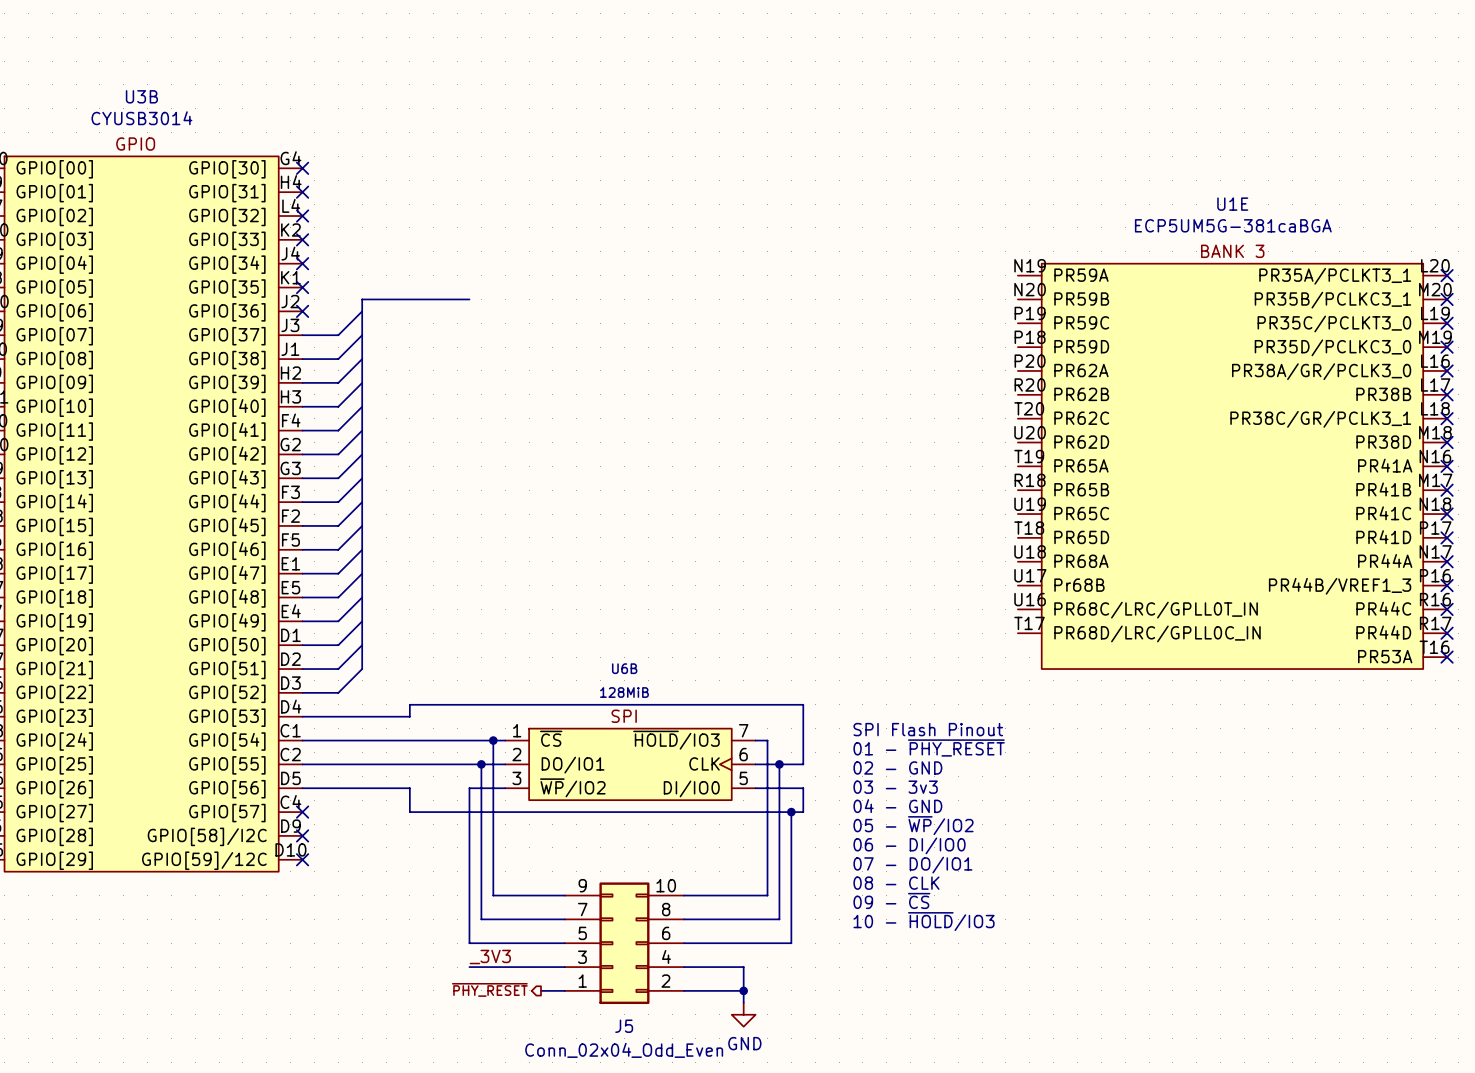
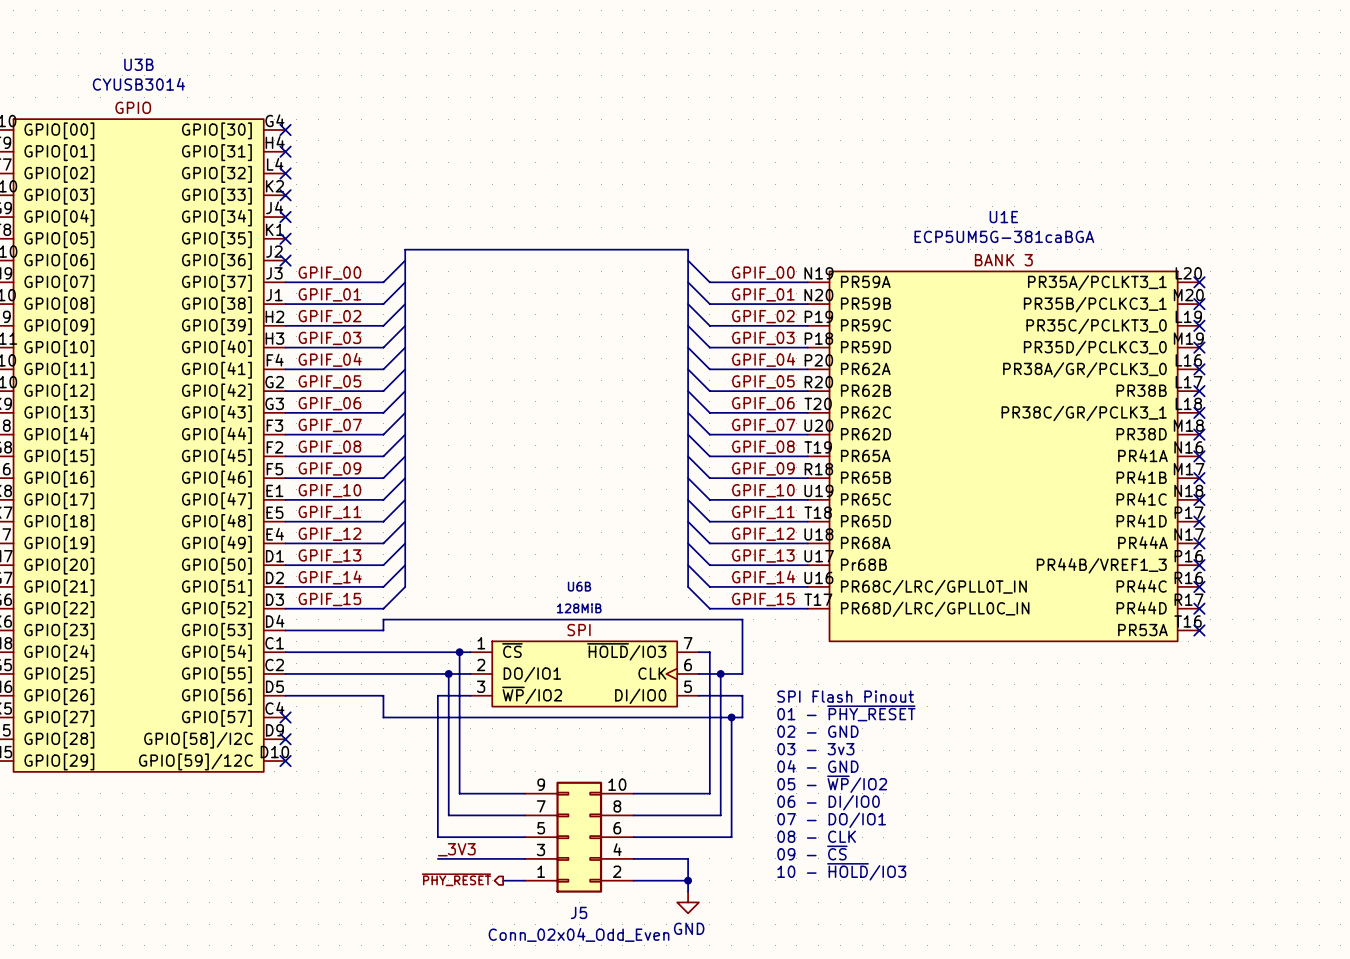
no-connect mark: (1447, 275) -> none
bus: (433, 299) (362, 299) (362, 669) -> (405, 249) (405, 586)
bus: none -> (437, 249) (688, 249) (688, 586)
no-connect mark: (1447, 299) -> none
wire: (362, 311) (338, 335) -> (405, 260) (383, 282) (318, 282)
wire: none -> (688, 260) (709, 282) (807, 282)
no-connect mark: (1447, 323) -> none
label: none -> GPIF_00 (329, 273)
label: none -> GPIF_00 (763, 273)
wire: (362, 335) (338, 359) -> (405, 282) (383, 304) (318, 304)
wire: none -> (688, 282) (709, 304) (807, 304)
no-connect mark: none -> (1199, 282)
no-connect mark: (1447, 347) -> none
label: none -> GPIF_01 (329, 294)
label: none -> GPIF_01 (763, 294)
wire: (362, 359) (338, 382) -> (405, 304) (383, 325) (318, 325)
wire: none -> (688, 304) (709, 325) (807, 325)
no-connect mark: none -> (1199, 304)
no-connect mark: (1447, 370) -> none
label: none -> GPIF_02 (329, 316)
label: none -> GPIF_02 (763, 316)
wire: (362, 382) (338, 406) -> (405, 325) (383, 347) (318, 347)
wire: none -> (688, 325) (709, 347) (807, 347)
no-connect mark: none -> (1199, 325)
no-connect mark: (1447, 394) -> none
label: none -> GPIF_03 (329, 338)
label: none -> GPIF_03 (763, 338)
wire: (362, 406) (338, 430) -> (405, 347) (383, 369) (318, 369)
wire: none -> (688, 347) (709, 369) (807, 369)
no-connect mark: none -> (1199, 347)
no-connect mark: (1447, 418) -> none
label: none -> GPIF_04 (330, 359)
label: none -> GPIF_04 (763, 359)
wire: (362, 430) (338, 454) -> (405, 369) (383, 391) (318, 391)
wire: none -> (688, 369) (709, 391) (807, 391)
no-connect mark: none -> (1199, 369)
no-connect mark: (1447, 442) -> none
label: none -> GPIF_05 (329, 381)
label: none -> GPIF_05 (763, 381)
wire: (362, 454) (338, 478) -> (405, 391) (383, 412) (318, 412)
wire: none -> (688, 391) (709, 412) (807, 412)
no-connect mark: none -> (1199, 391)
U1E position: (1232, 466) -> (1003, 456)
no-connect mark: (1447, 466) -> none
label: none -> GPIF_06 (329, 403)
label: none -> GPIF_06 (763, 403)
wire: (362, 478) (338, 502) -> (405, 412) (383, 434) (318, 434)
wire: none -> (688, 412) (709, 434) (807, 434)
no-connect mark: none -> (1199, 412)
no-connect mark: (1447, 490) -> none
label: none -> GPIF_07 (330, 425)
label: none -> GPIF_07 (763, 425)
wire: (362, 502) (338, 525) -> (405, 434) (383, 456) (318, 456)
wire: none -> (688, 434) (709, 456) (807, 456)
no-connect mark: none -> (1199, 434)
no-connect mark: (1447, 514) -> none
label: none -> GPIF_08 (329, 447)
label: none -> GPIF_08 (763, 447)
wire: (362, 525) (338, 549) -> (405, 456) (383, 478) (318, 478)
wire: none -> (688, 456) (709, 478) (807, 478)
no-connect mark: none -> (1199, 456)
no-connect mark: (1447, 537) -> none
label: none -> GPIF_09 (329, 468)
label: none -> GPIF_09 (763, 468)
wire: (362, 549) (338, 573) -> (405, 478) (383, 499) (318, 499)
wire: none -> (688, 478) (709, 499) (807, 499)
no-connect mark: none -> (1199, 478)
no-connect mark: (1447, 561) -> none
label: none -> GPIF_10 (329, 490)
label: none -> GPIF_10 (763, 490)
wire: (362, 573) (338, 597) -> (405, 499) (383, 521) (318, 521)
wire: none -> (688, 499) (709, 521) (807, 521)
no-connect mark: none -> (1199, 499)
no-connect mark: (1447, 585) -> none
label: none -> GPIF_11 (329, 512)
label: none -> GPIF_11 (763, 512)
wire: (362, 597) (338, 621) -> (405, 521) (383, 543) (318, 543)
wire: none -> (688, 521) (709, 543) (807, 543)
no-connect mark: none -> (1199, 521)
no-connect mark: (1447, 609) -> none
label: none -> GPIF_12 (329, 534)
label: none -> GPIF_12 (763, 534)
wire: (362, 621) (338, 645) -> (405, 543) (383, 565) (318, 565)
wire: none -> (688, 543) (709, 565) (807, 565)
no-connect mark: none -> (1199, 543)
no-connect mark: (1447, 633) -> none
label: none -> GPIF_13 (329, 555)
label: none -> GPIF_13 (763, 555)
wire: (362, 645) (338, 669) -> (405, 565) (383, 586) (318, 586)
wire: none -> (688, 565) (709, 586) (807, 586)
no-connect mark: none -> (1199, 565)
no-connect mark: (1447, 657) -> none
label: none -> GPIF_14 (330, 577)
label: none -> GPIF_14 (763, 577)
wire: (362, 669) (338, 692) -> (405, 586) (383, 608) (318, 608)
wire: none -> (688, 586) (709, 608) (807, 608)
no-connect mark: none -> (1199, 586)
label: none -> GPIF_15 (329, 599)
label: none -> GPIF_15 (763, 599)
no-connect mark: none -> (1199, 608)
no-connect mark: none -> (1199, 630)
text position: SPI Flash Pinout (928, 729) -> SPI Flash Pinout (845, 696)
text position: 01 - ~{PHY_RESET} (929, 747) -> 01 - ~{PHY_RESET} (846, 713)
text position: 02 - GND (897, 767) -> 02 - GND (817, 731)
text position: 03 - 3v3 (895, 787) -> 03 - 3v3 (815, 749)
text position: 04 - GND (897, 806) -> 04 - GND (817, 766)
text position: 05 - ~{WP}/IO2 (913, 825) -> 05 - ~{WP}/IO2 (832, 784)
text position: 06 - DI/IO0 (909, 845) -> 06 - DI/IO0 (828, 802)
text position: 07 - DO/IO1 (912, 865) -> 07 - DO/IO1 (831, 820)
text position: 08 - CLK (896, 883) -> 08 - CLK (816, 836)
text position: 09 - ~{CS} (891, 900) -> 09 - ~{CS} (812, 853)
text position: 10 - ~{HOLD}/IO3 (924, 921) -> 10 - ~{HOLD}/IO3 (841, 871)

